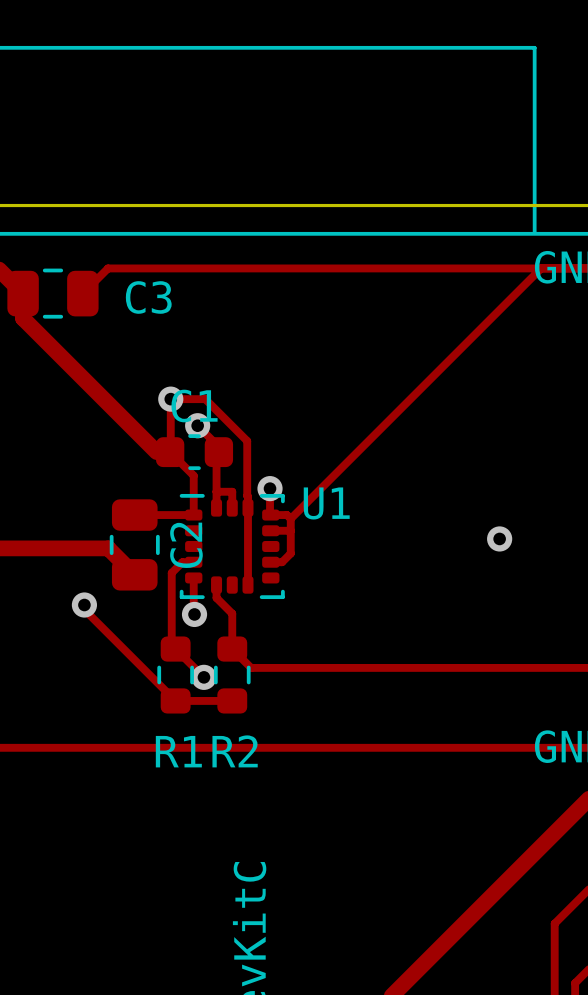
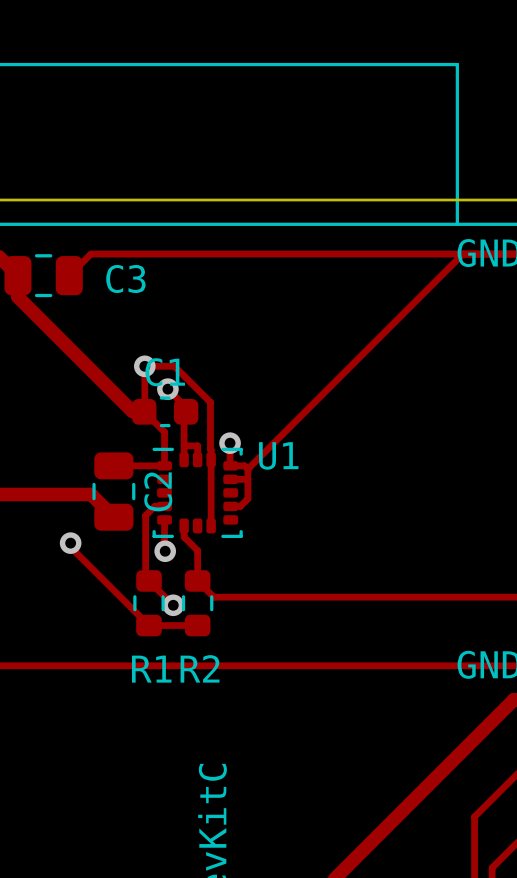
via: (499, 538) -> none

